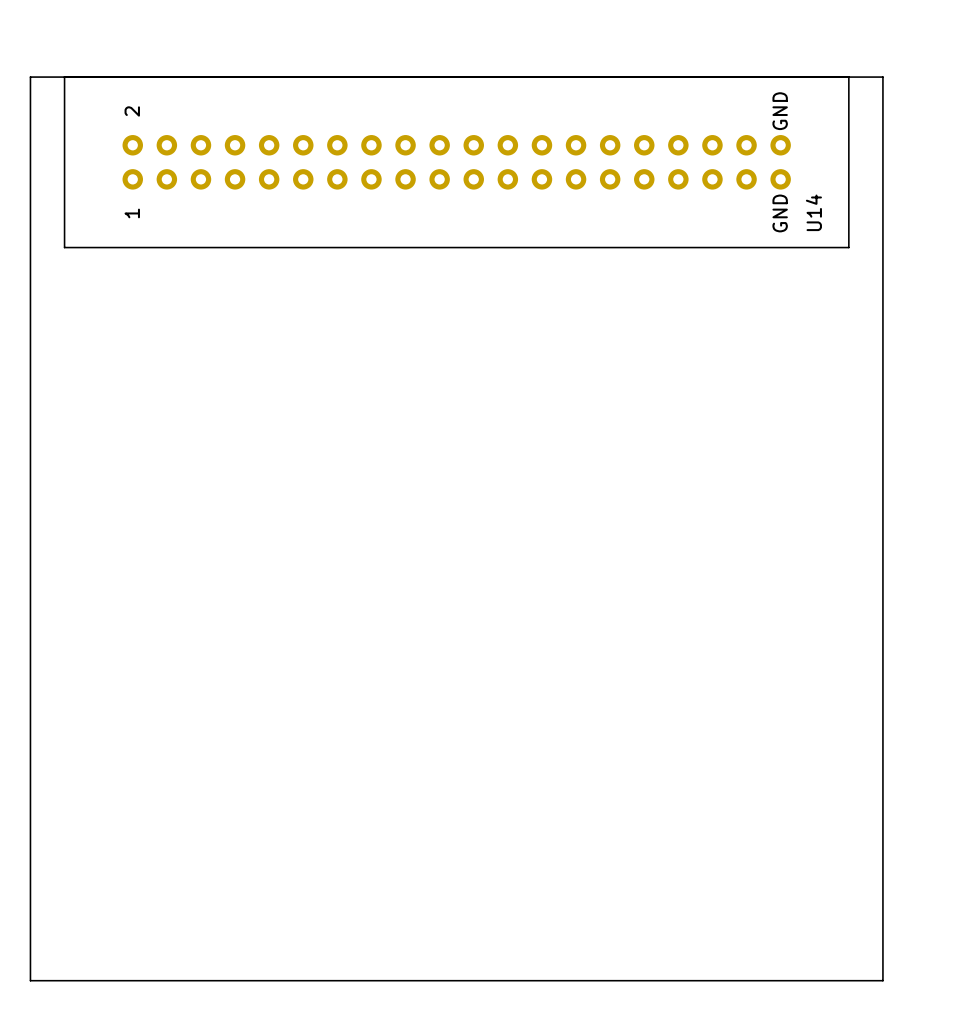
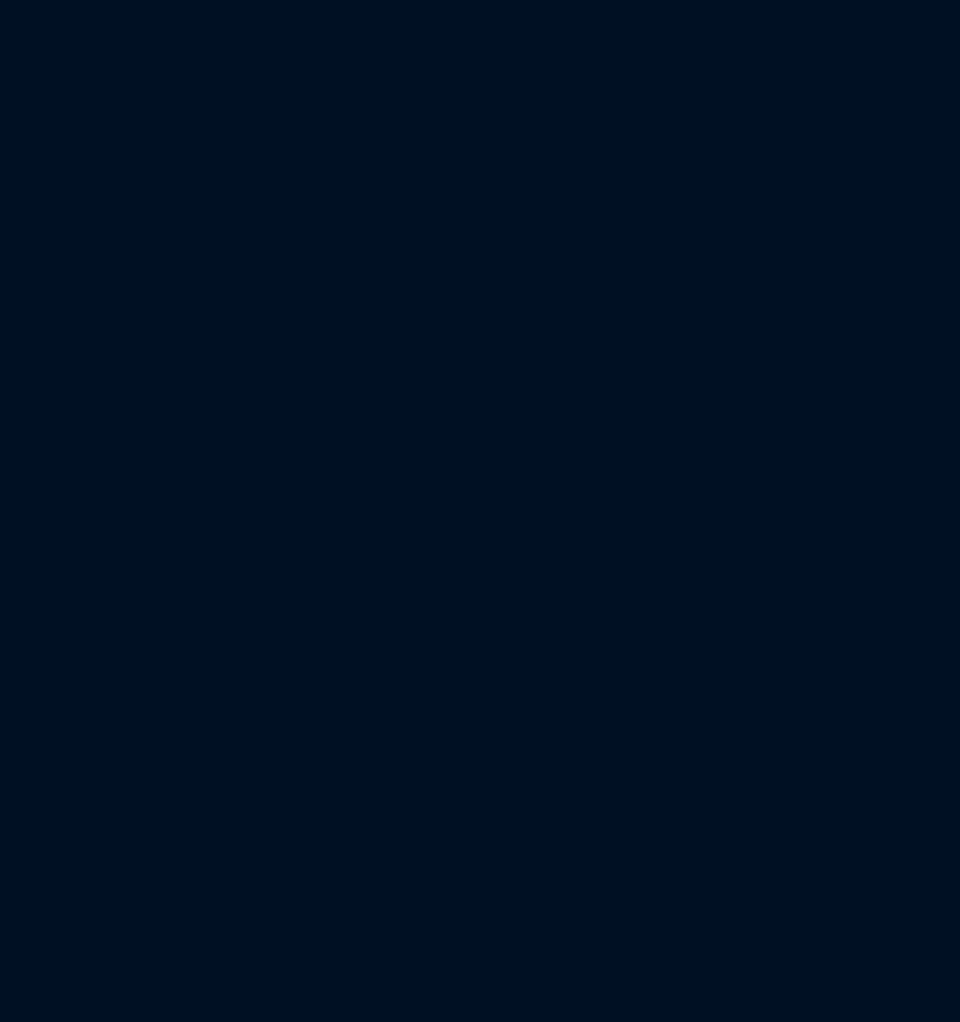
U14: (456, 528) -> none

